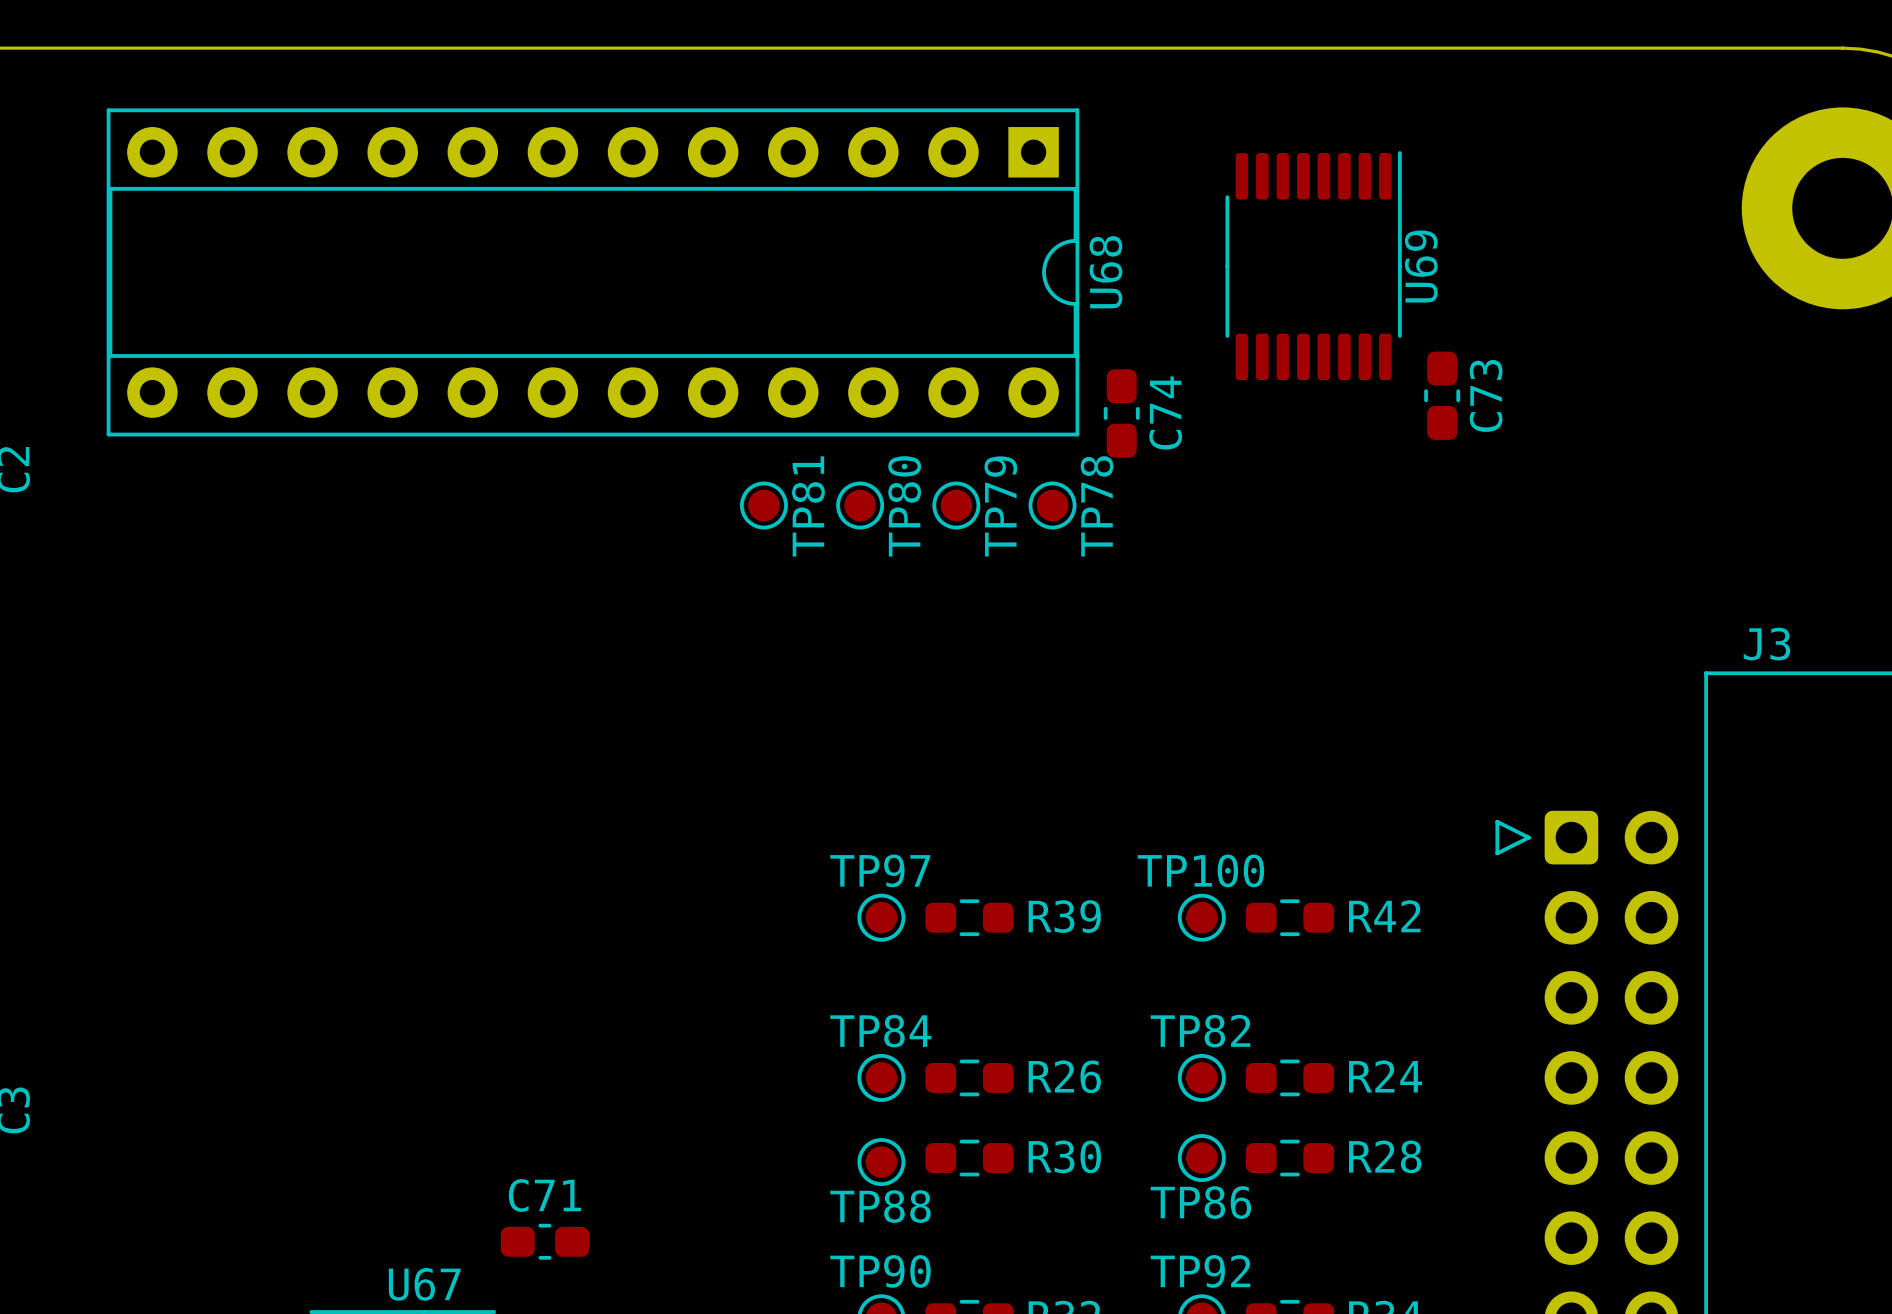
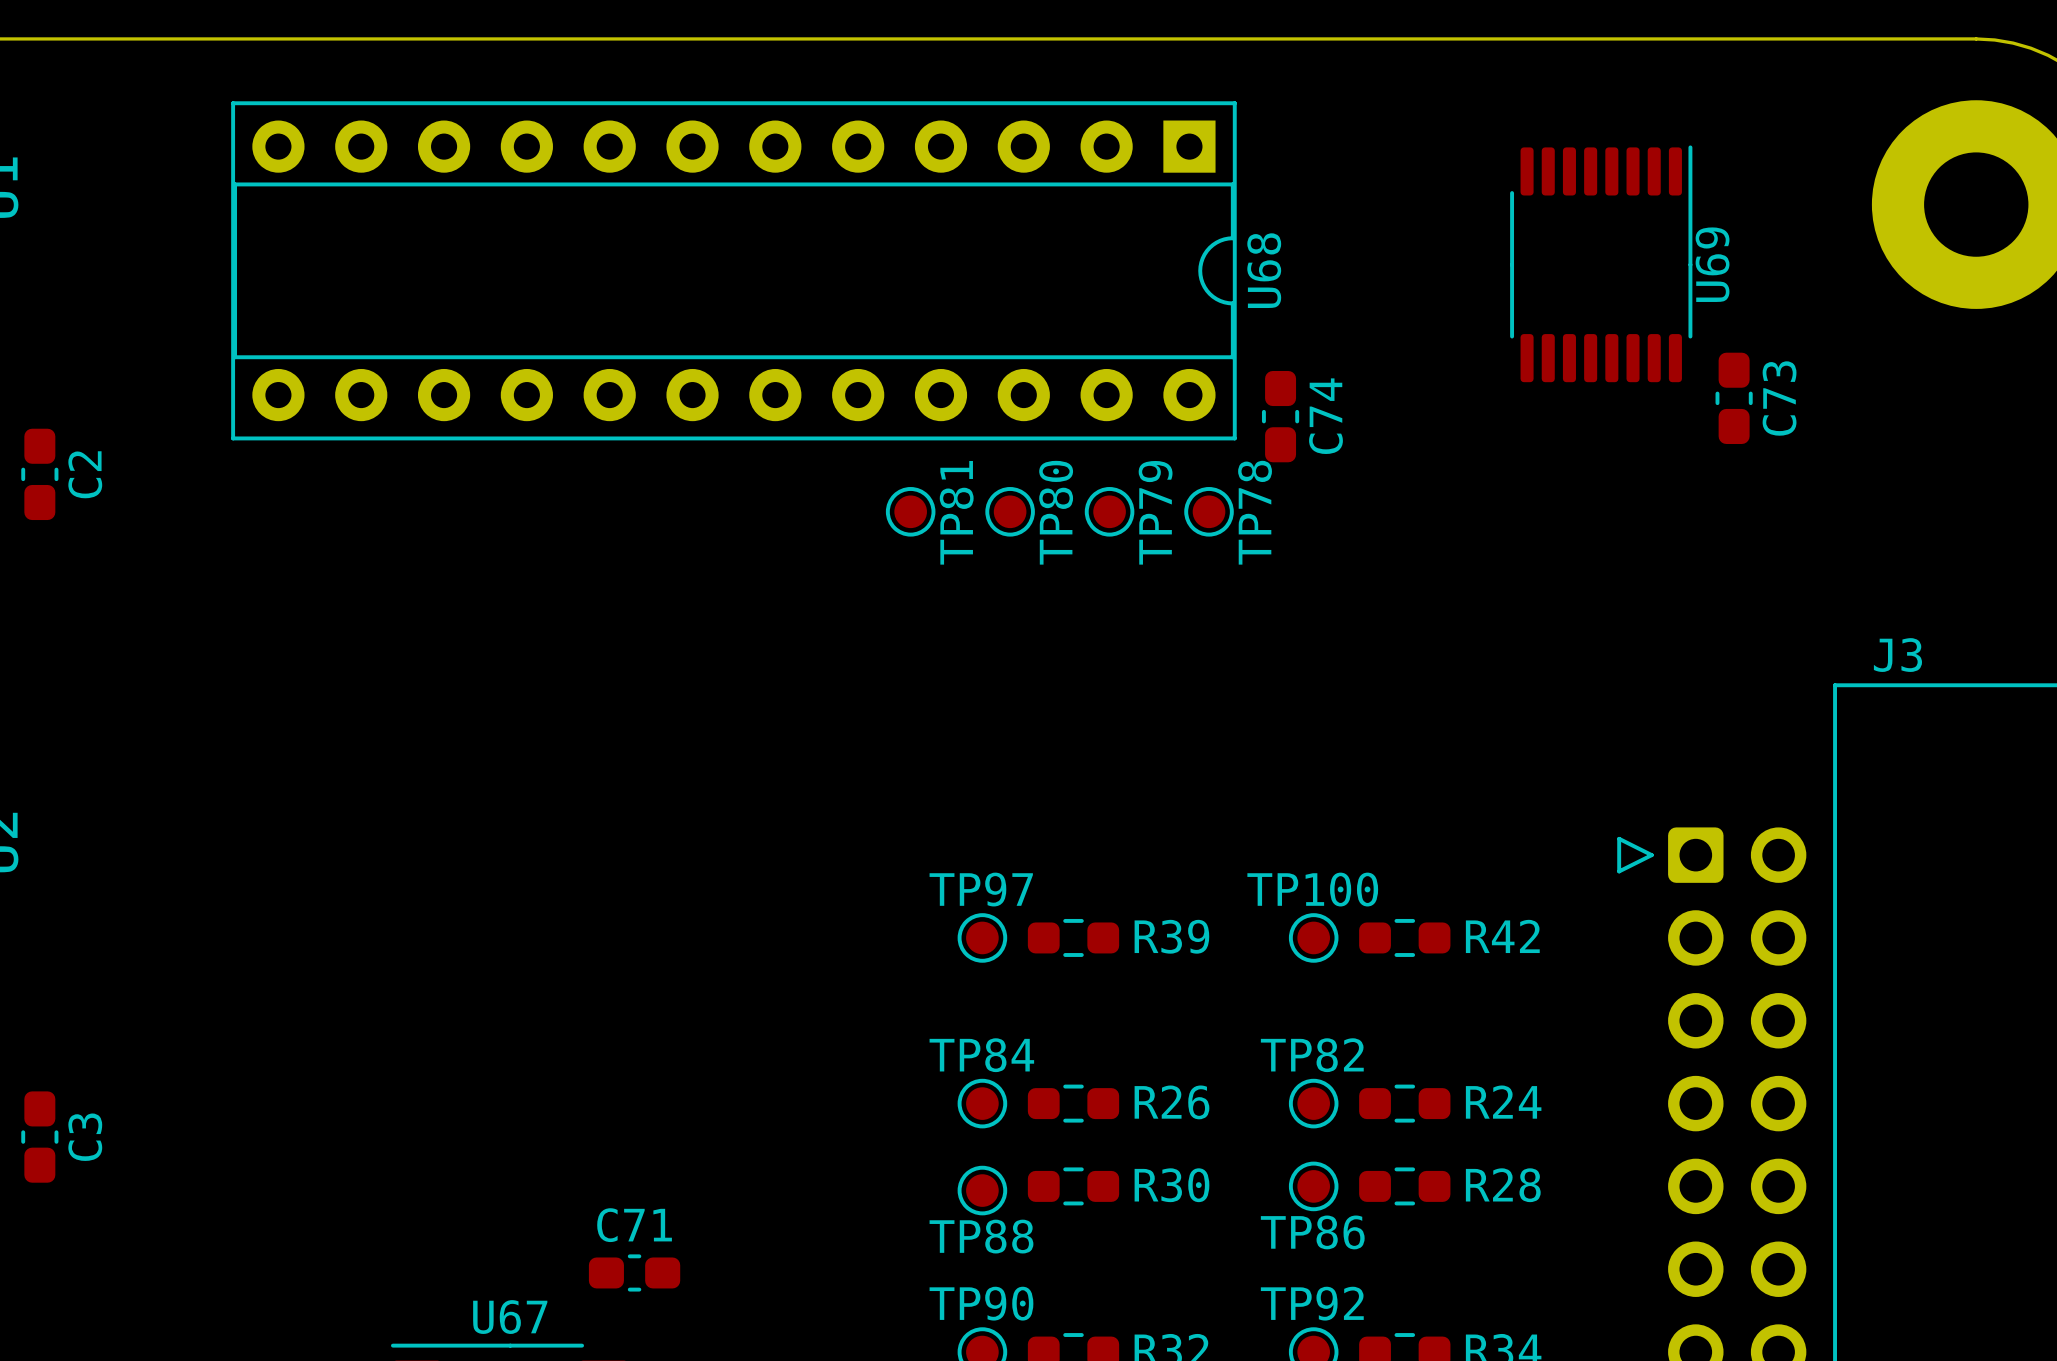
U69 position: (1313, 265) -> (1601, 263)
U68 position: (592, 272) -> (733, 270)
C73 position: (1442, 395) -> (1734, 398)
C74 position: (1121, 413) -> (1280, 416)
TP81 position: (763, 505) -> (910, 511)
TP80 position: (860, 505) -> (1010, 511)
TP79 position: (956, 505) -> (1109, 511)
TP78 position: (1052, 505) -> (1209, 511)

